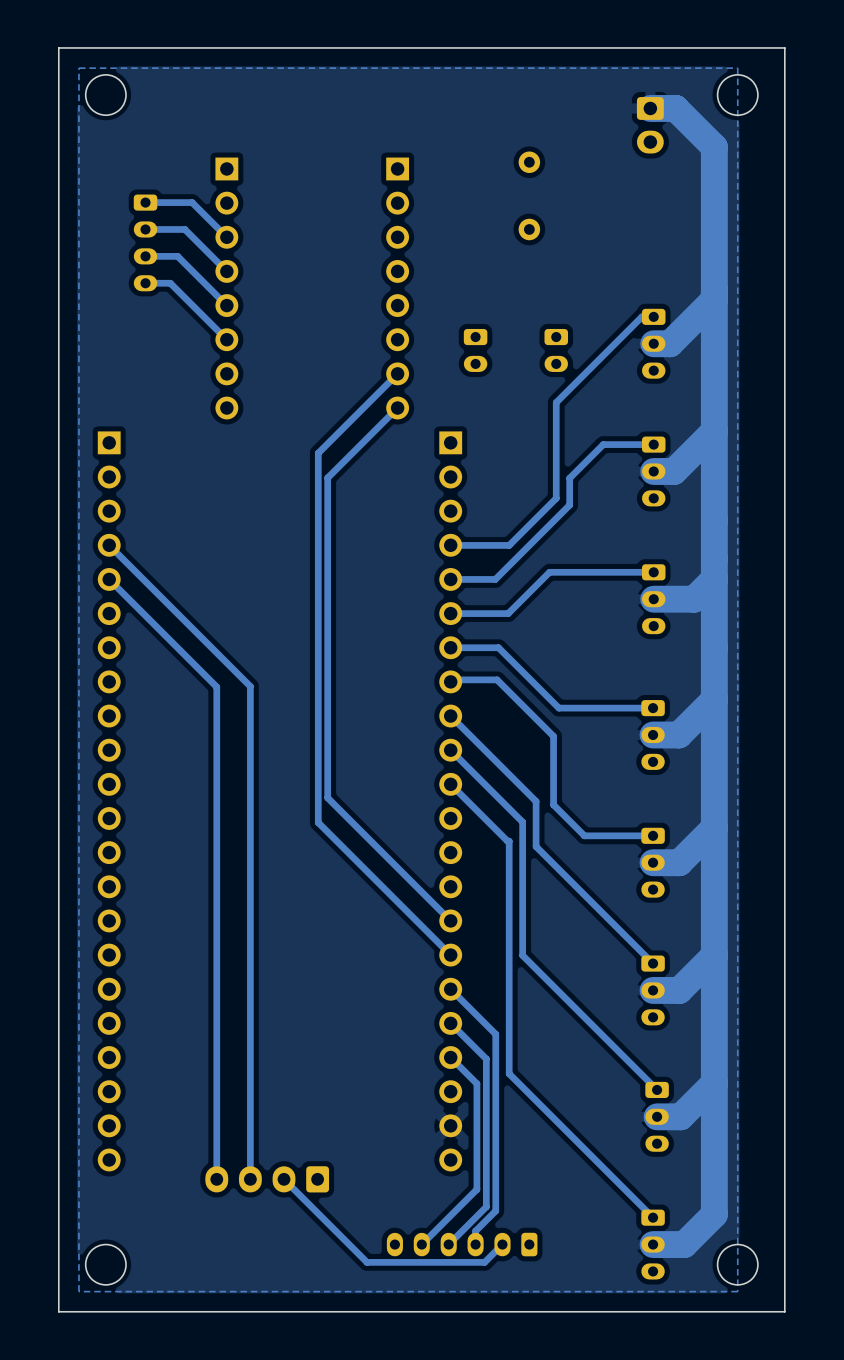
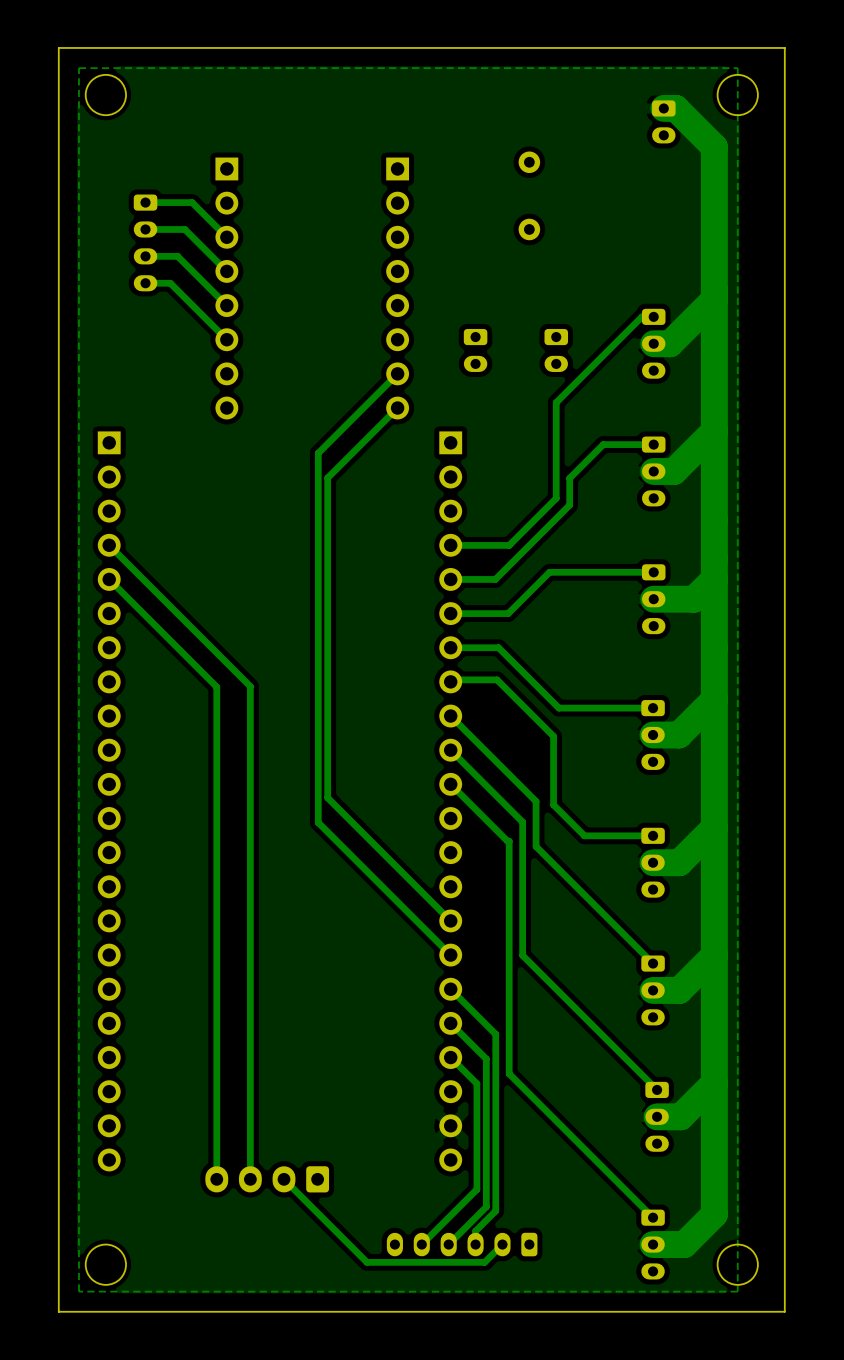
part: none -> (663, 121)
part: (650, 125) -> none

